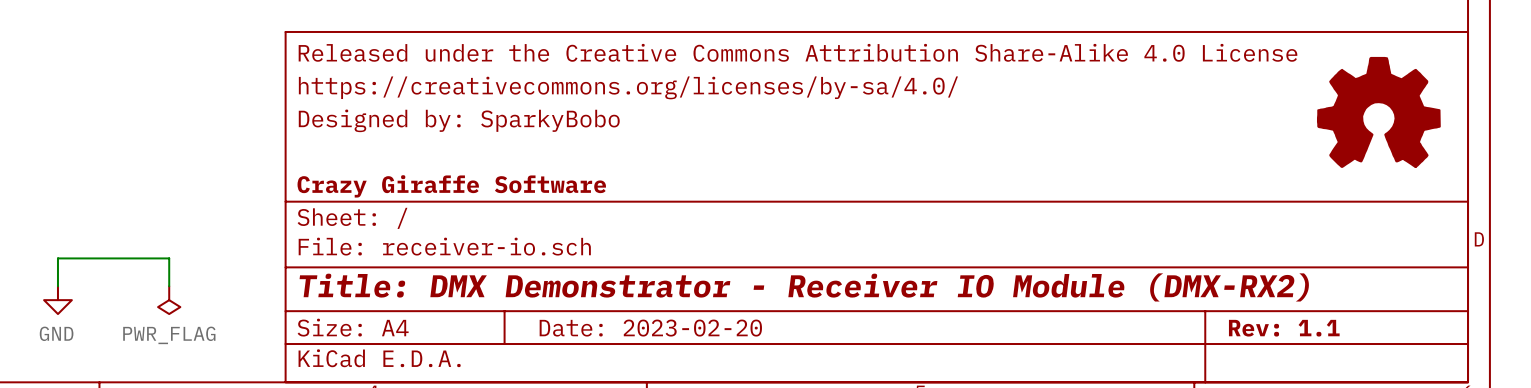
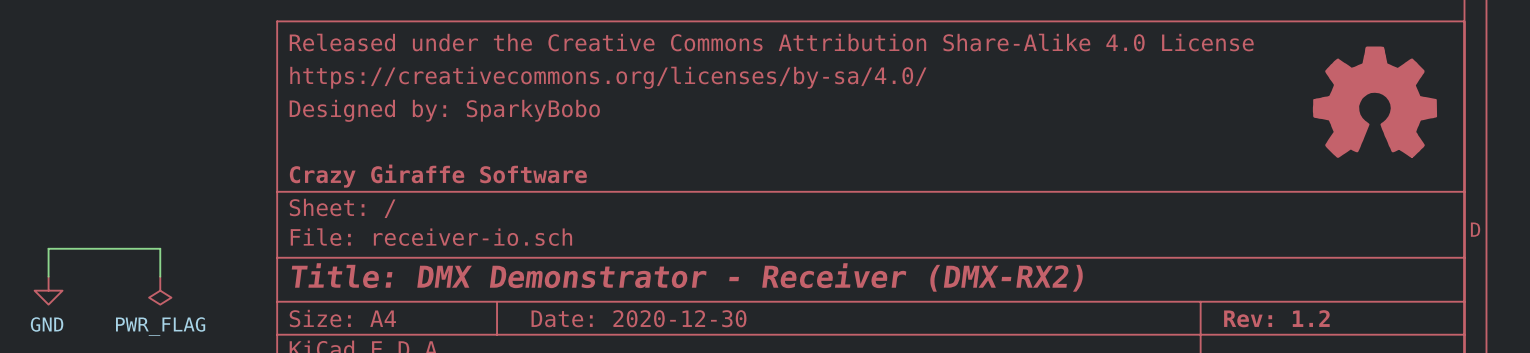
title block: Title: DMX Demonstrator - Receiver IO Module (DMX-RX2) (804, 287) -> Title: DMX Demonstrator - Receiver (DMX-RX2) (687, 277)
title block: Date: 2023-02-20 (650, 328) -> Date: 2020-12-30 (638, 318)
title block: Rev: 1.1 (1284, 328) -> Rev: 1.2 (1276, 318)

